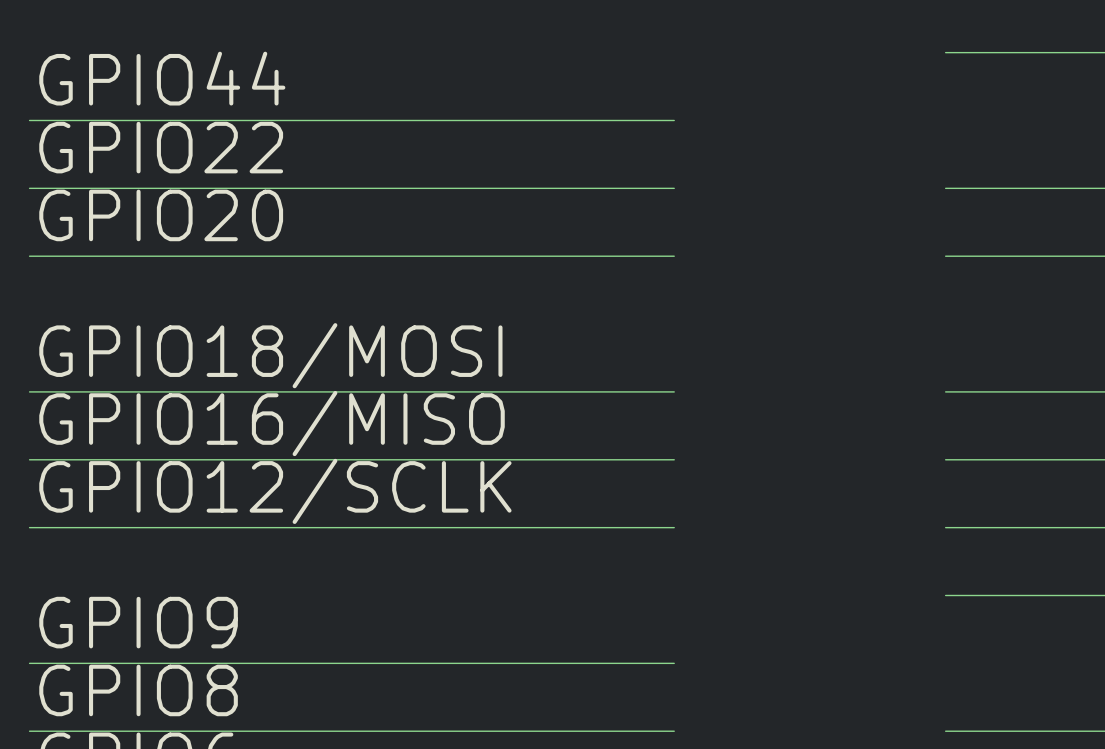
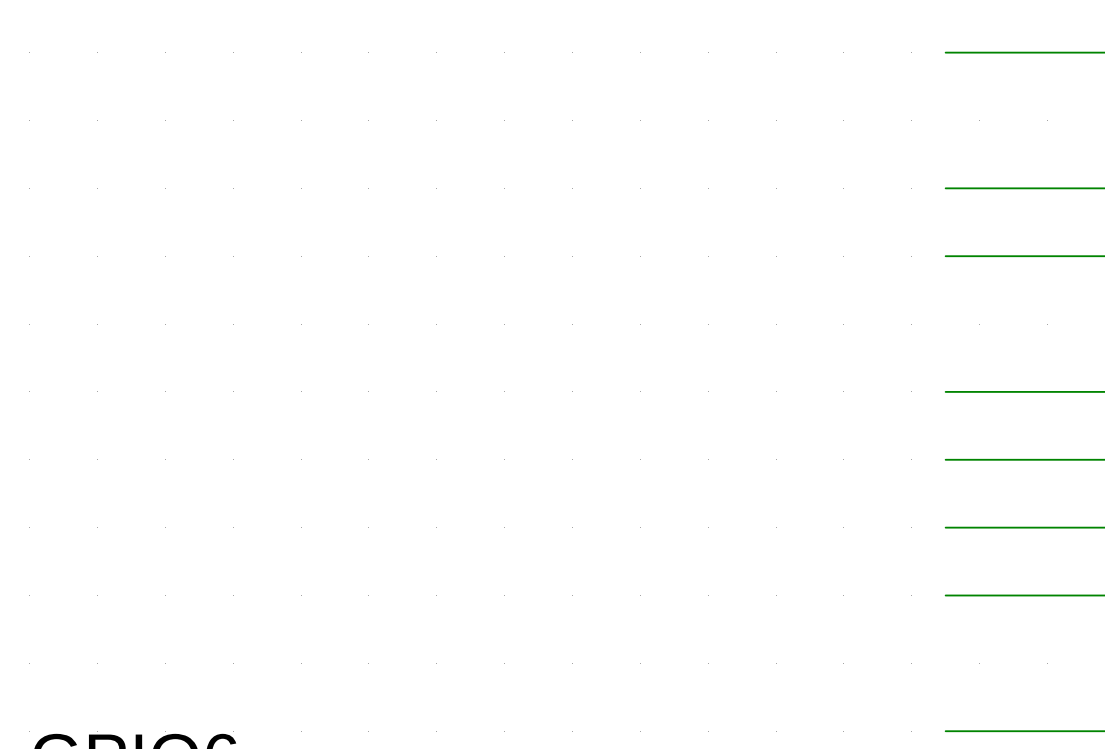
label: GPIO44 (162, 78) -> none
wire: (29, 120) (674, 120) -> none
label: GPIO22 (161, 147) -> none
wire: (29, 188) (674, 188) -> none
label: GPIO20 (161, 215) -> none
wire: (29, 256) (674, 256) -> none
label: GPIO18/MOSI (270, 355) -> none
wire: (29, 391) (674, 391) -> none
label: GPIO16/MISO (272, 423) -> none
wire: (29, 459) (674, 459) -> none
label: GPIO12/SCLK (275, 491) -> none
wire: (29, 527) (674, 527) -> none
label: GPIO9 (138, 622) -> none
wire: (29, 663) (674, 663) -> none
label: GPIO8 (138, 690) -> none
wire: (29, 731) (674, 731) -> none

